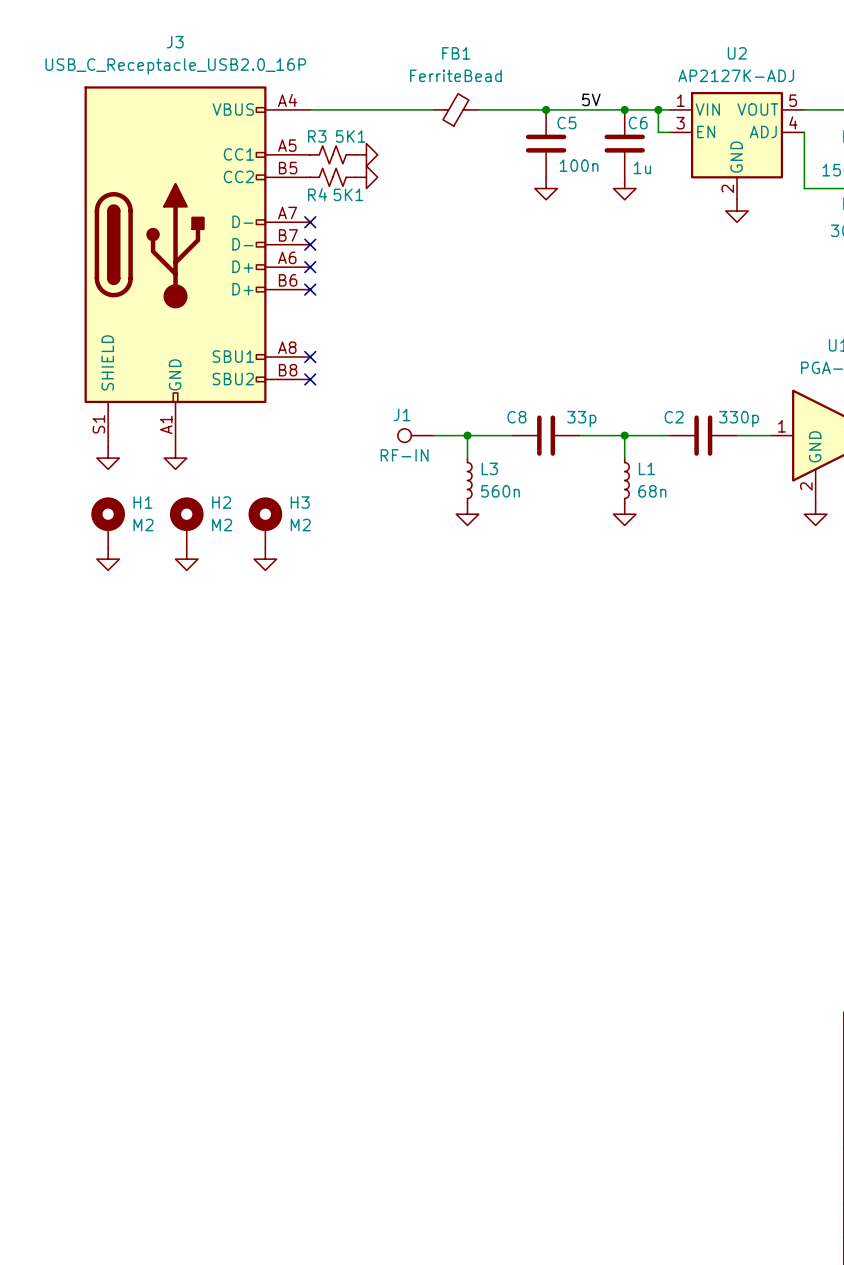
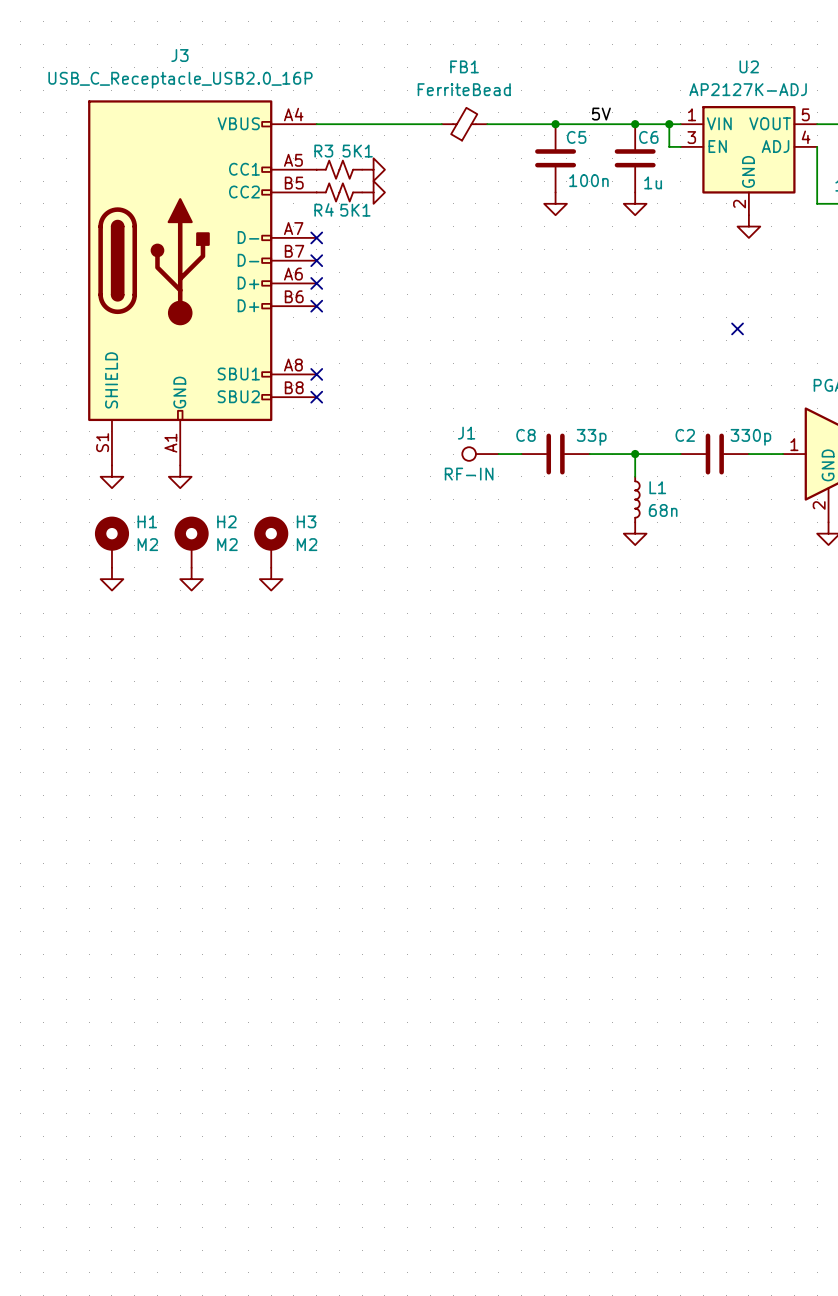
no-connect mark: none -> (737, 328)
J1 position: (415, 435) -> (480, 454)
wire: (433, 435) (489, 435) -> none
wire: (467, 435) (467, 458) -> none
junction: (467, 435) -> none
L3: 560n (469, 480) -> none
power symbol: (467, 514) -> none

